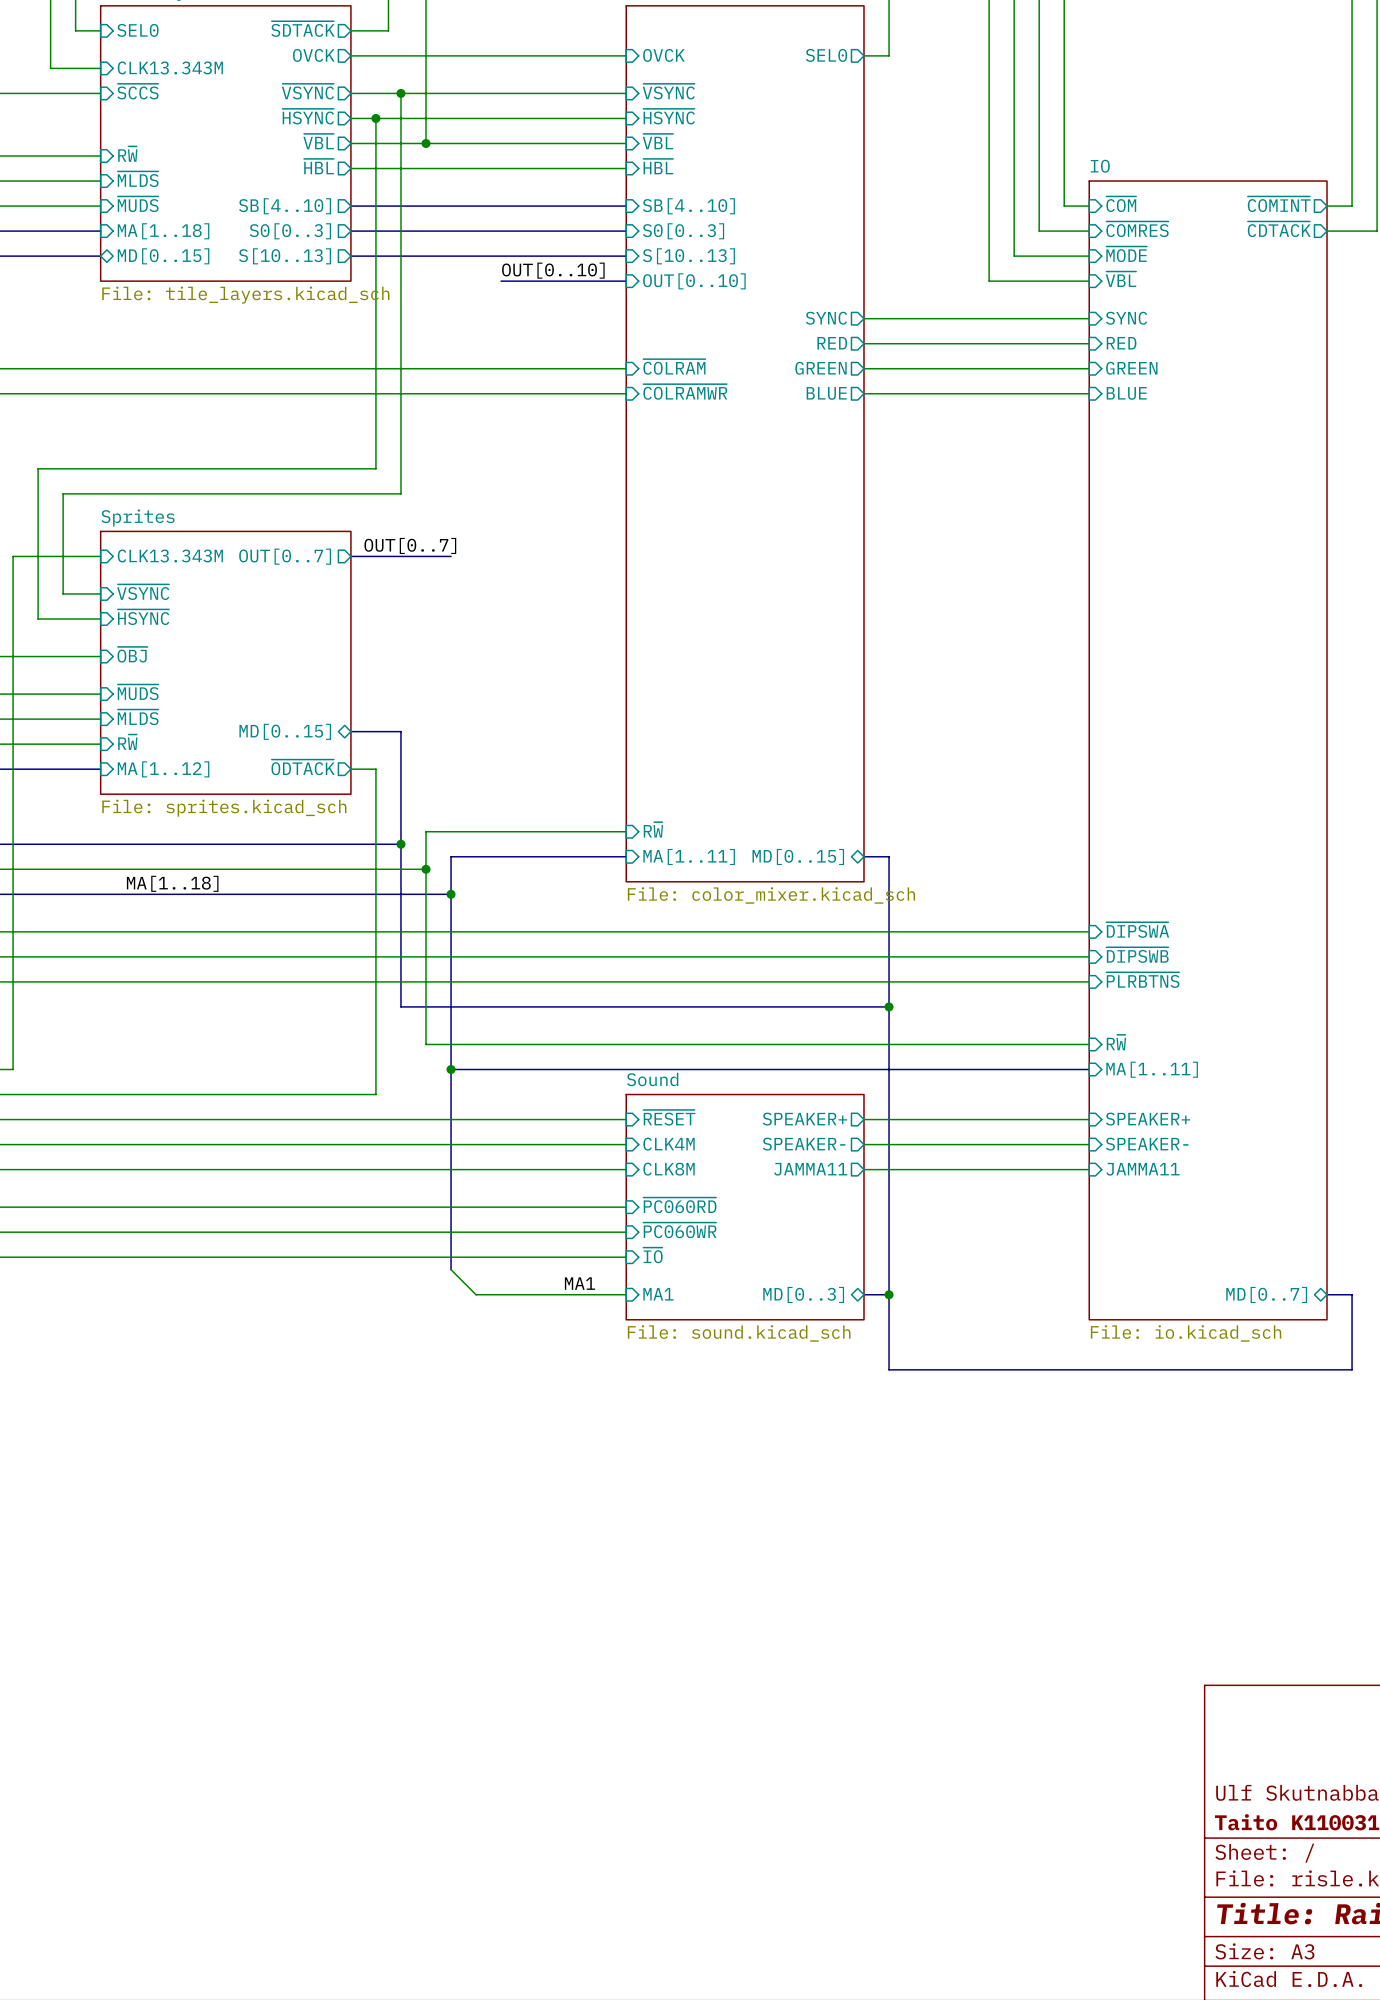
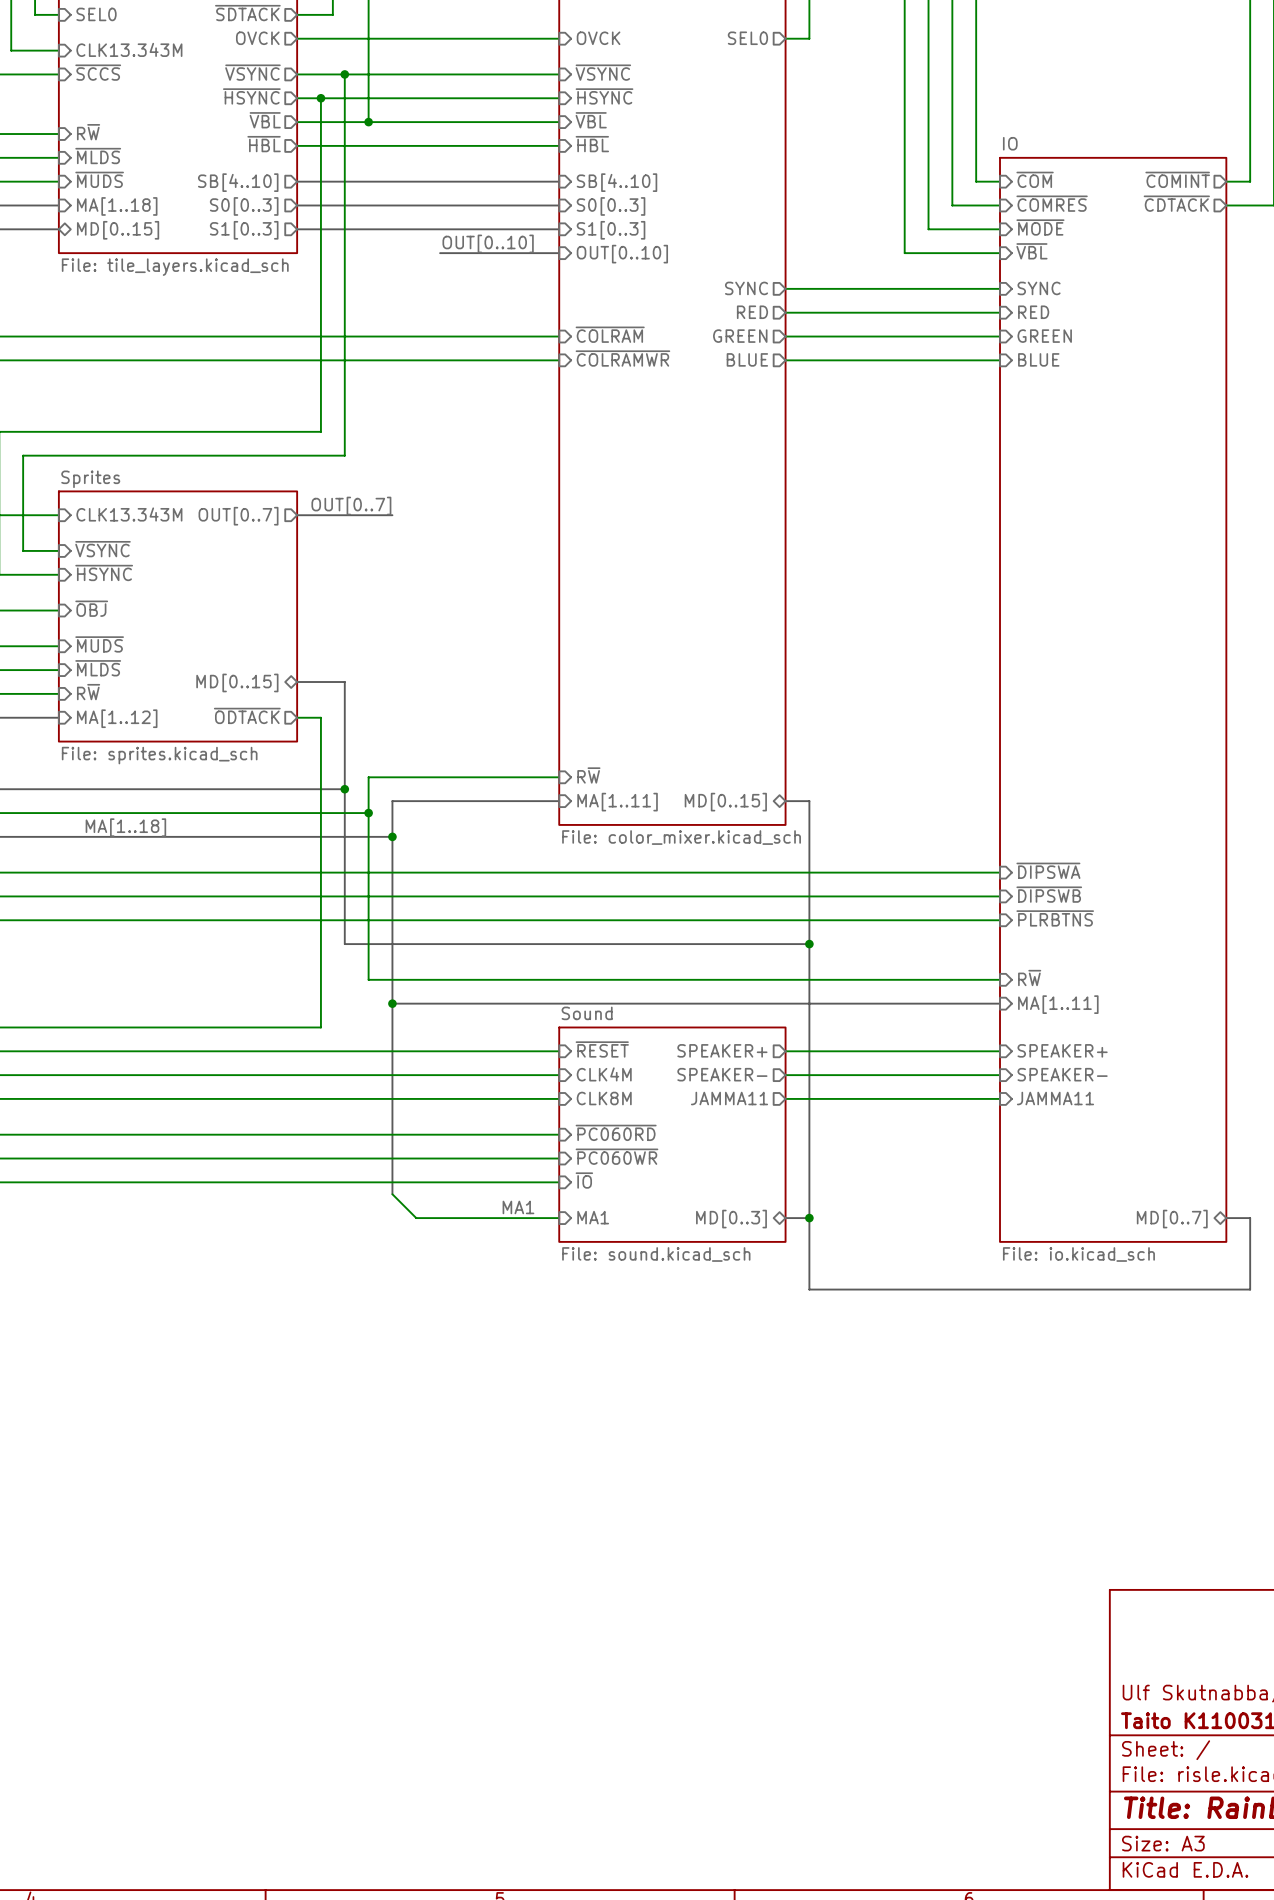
sheet pin: S[10..13] (285, 256) -> S1[0..3] (244, 230)
sheet pin: S[10..13] (688, 256) -> S1[0..3] (611, 230)

